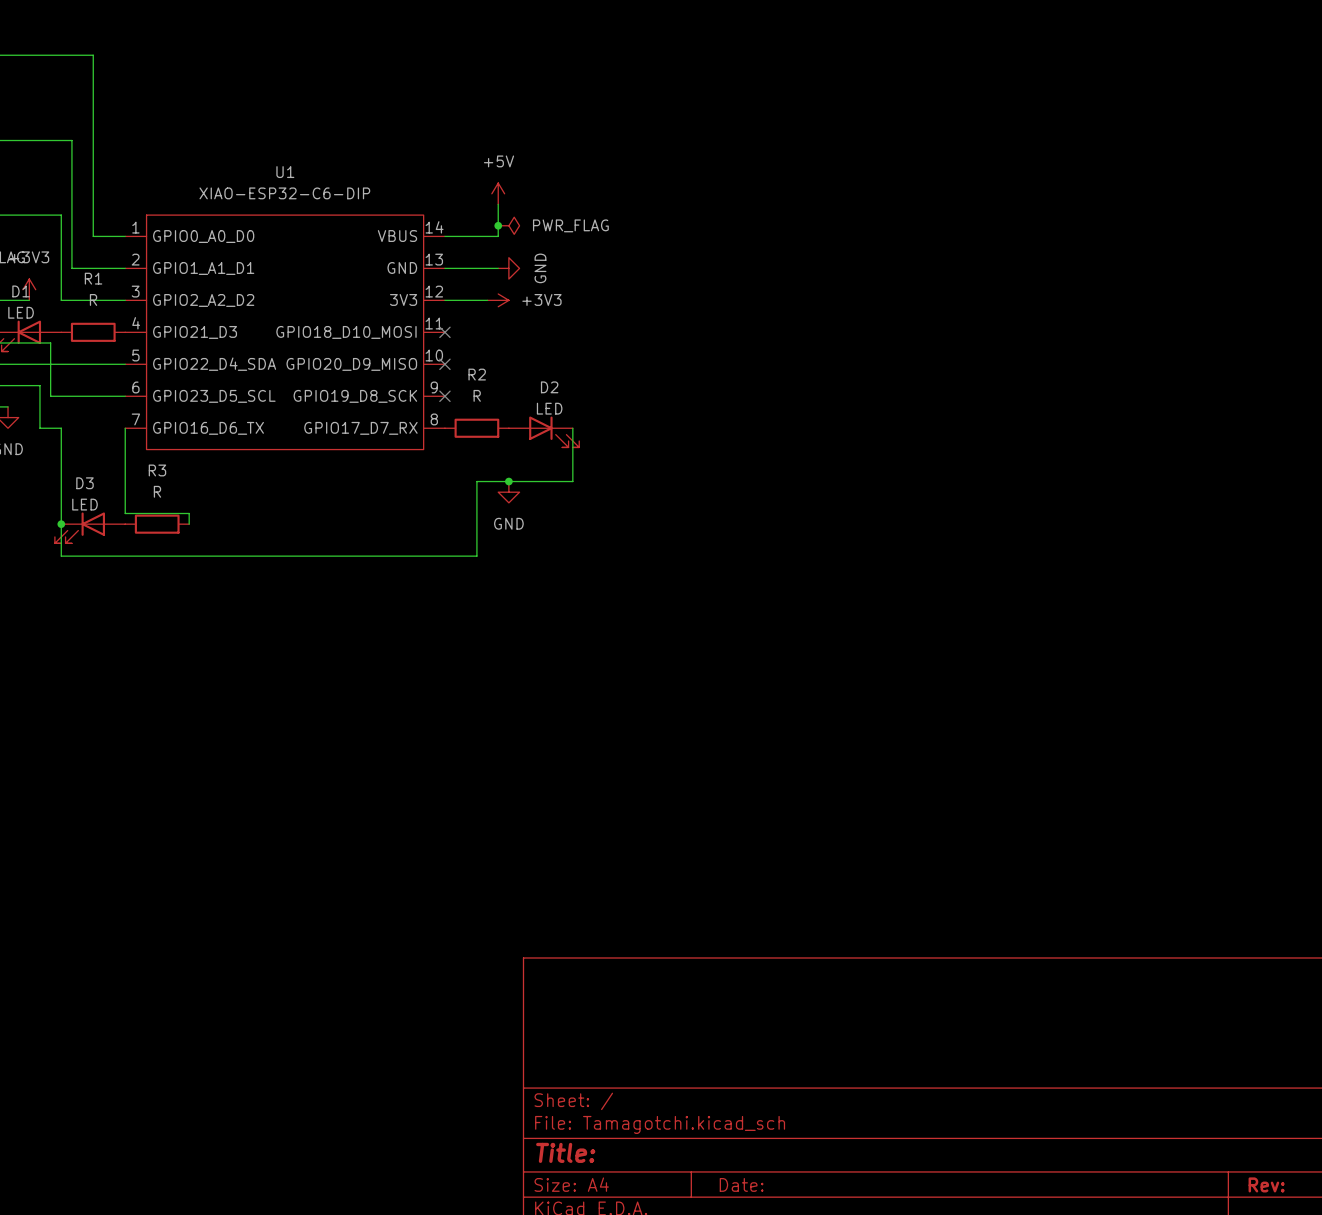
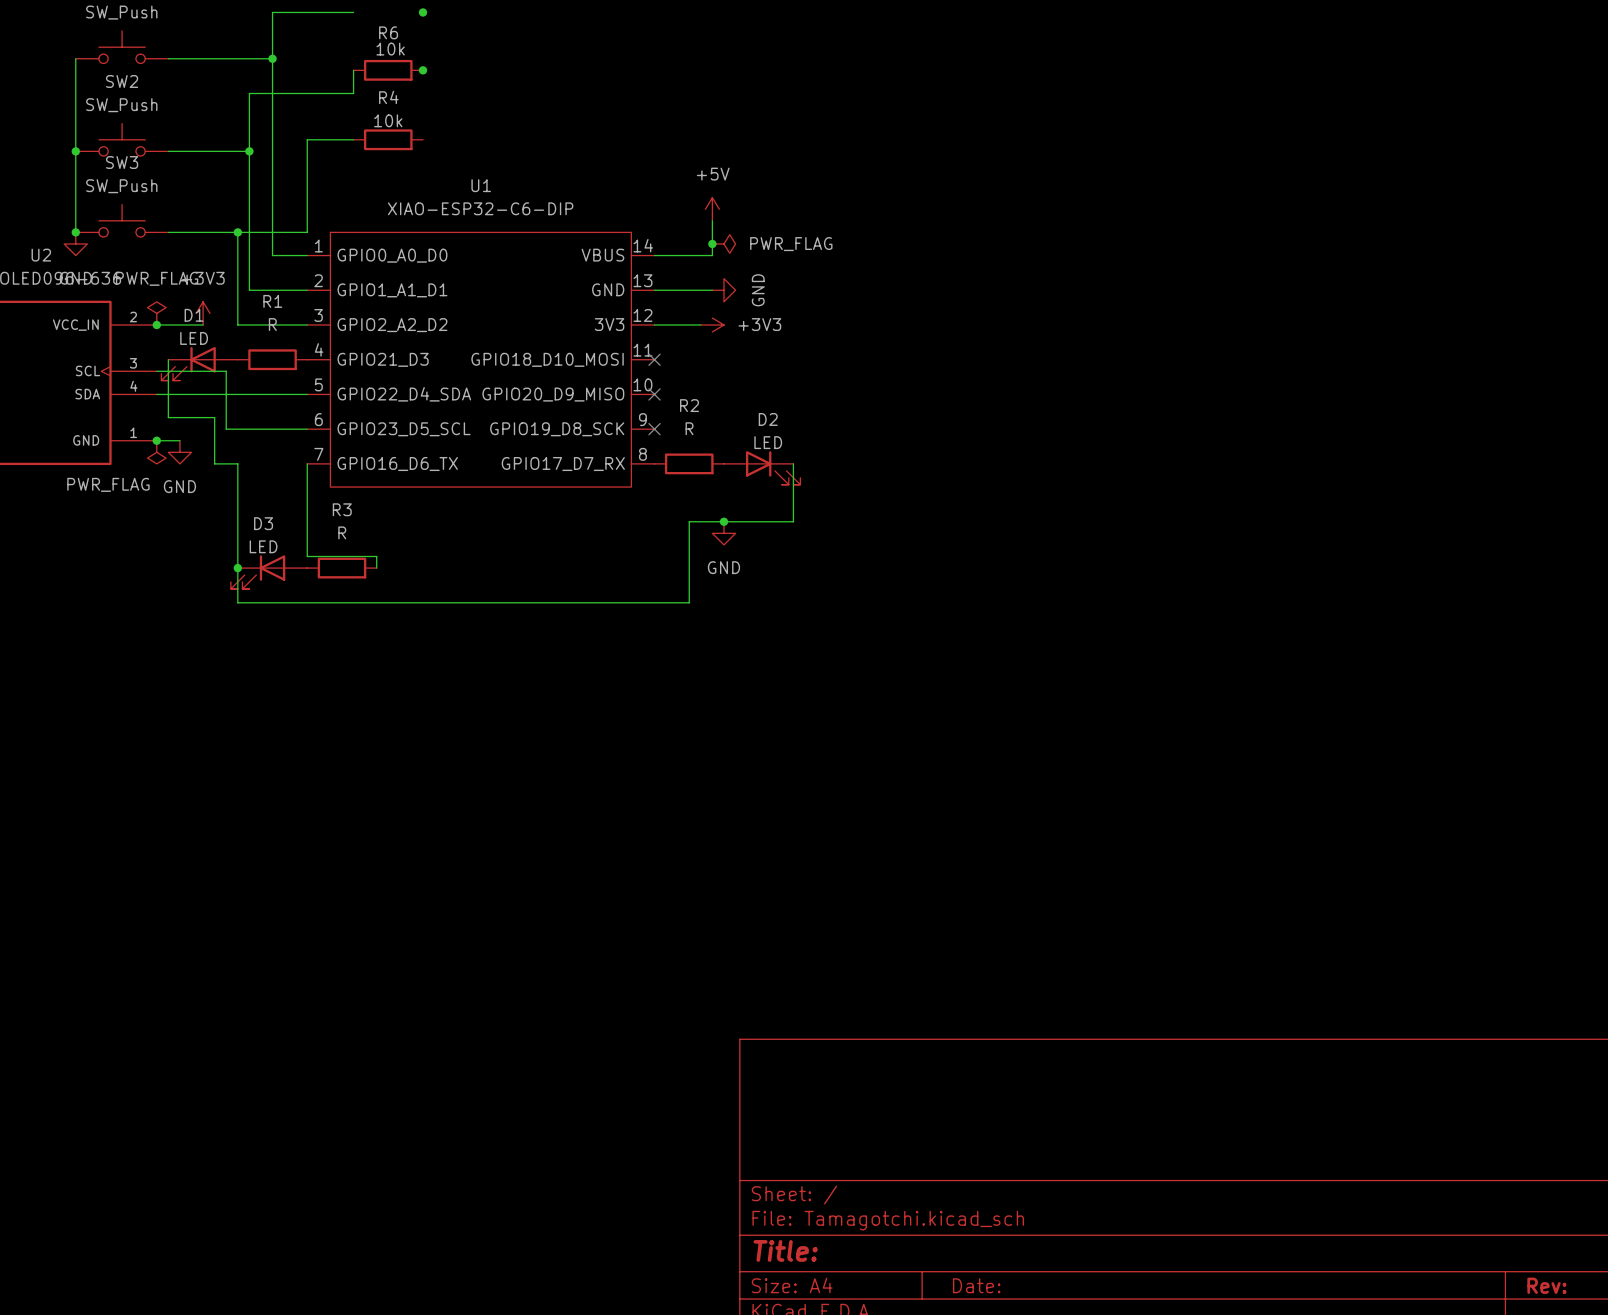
wire: none -> (353, 12) (272, 12) (272, 58)
junction: none -> (423, 12)
junction: none -> (272, 58)
wire: none -> (353, 70) (353, 93) (249, 93) (249, 151)
R6: none -> 10k (388, 70)
junction: none -> (423, 70)
wire: none -> (353, 139) (307, 139) (307, 232) (237, 232)
R4: none -> 10k (388, 139)
junction: none -> (249, 151)
junction: none -> (237, 232)

